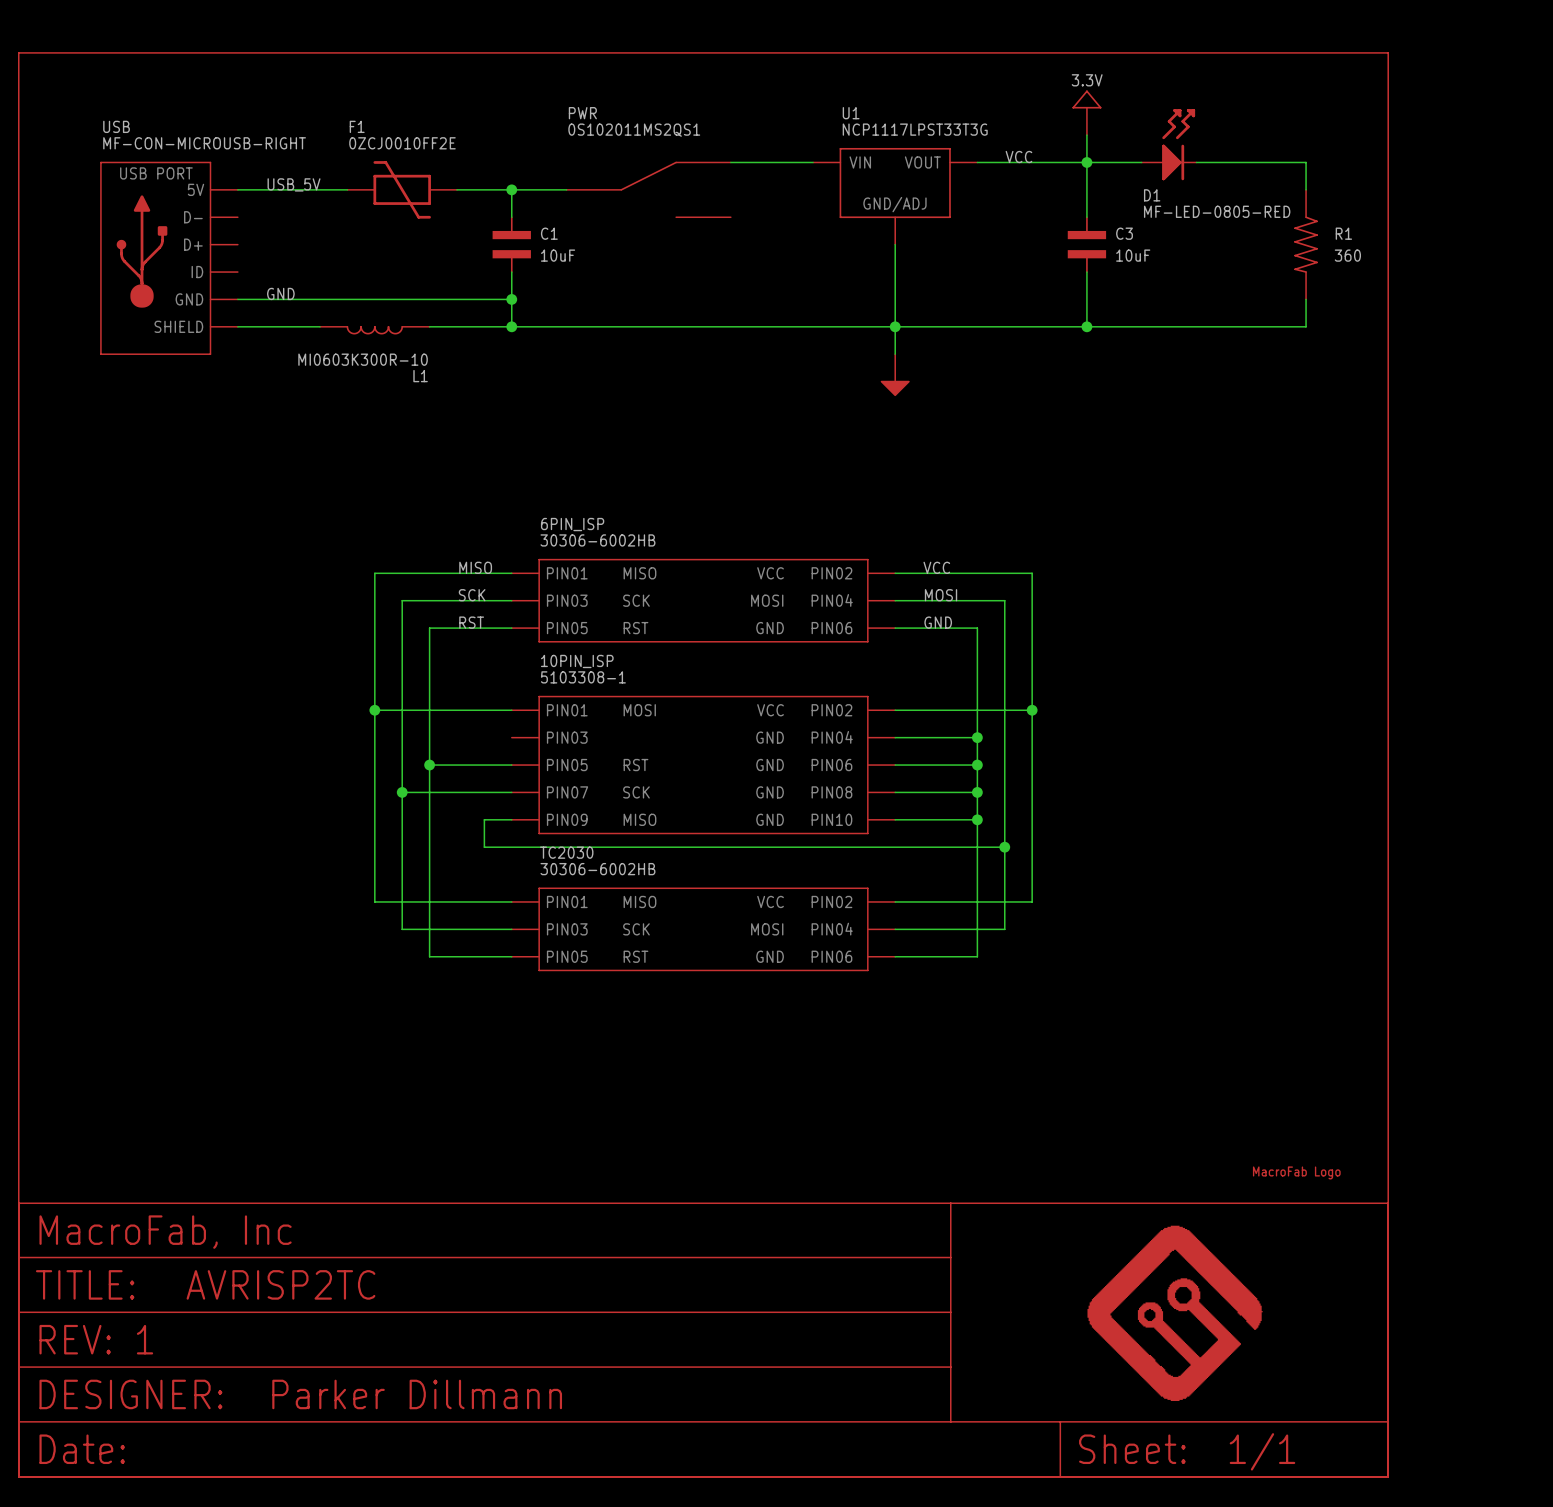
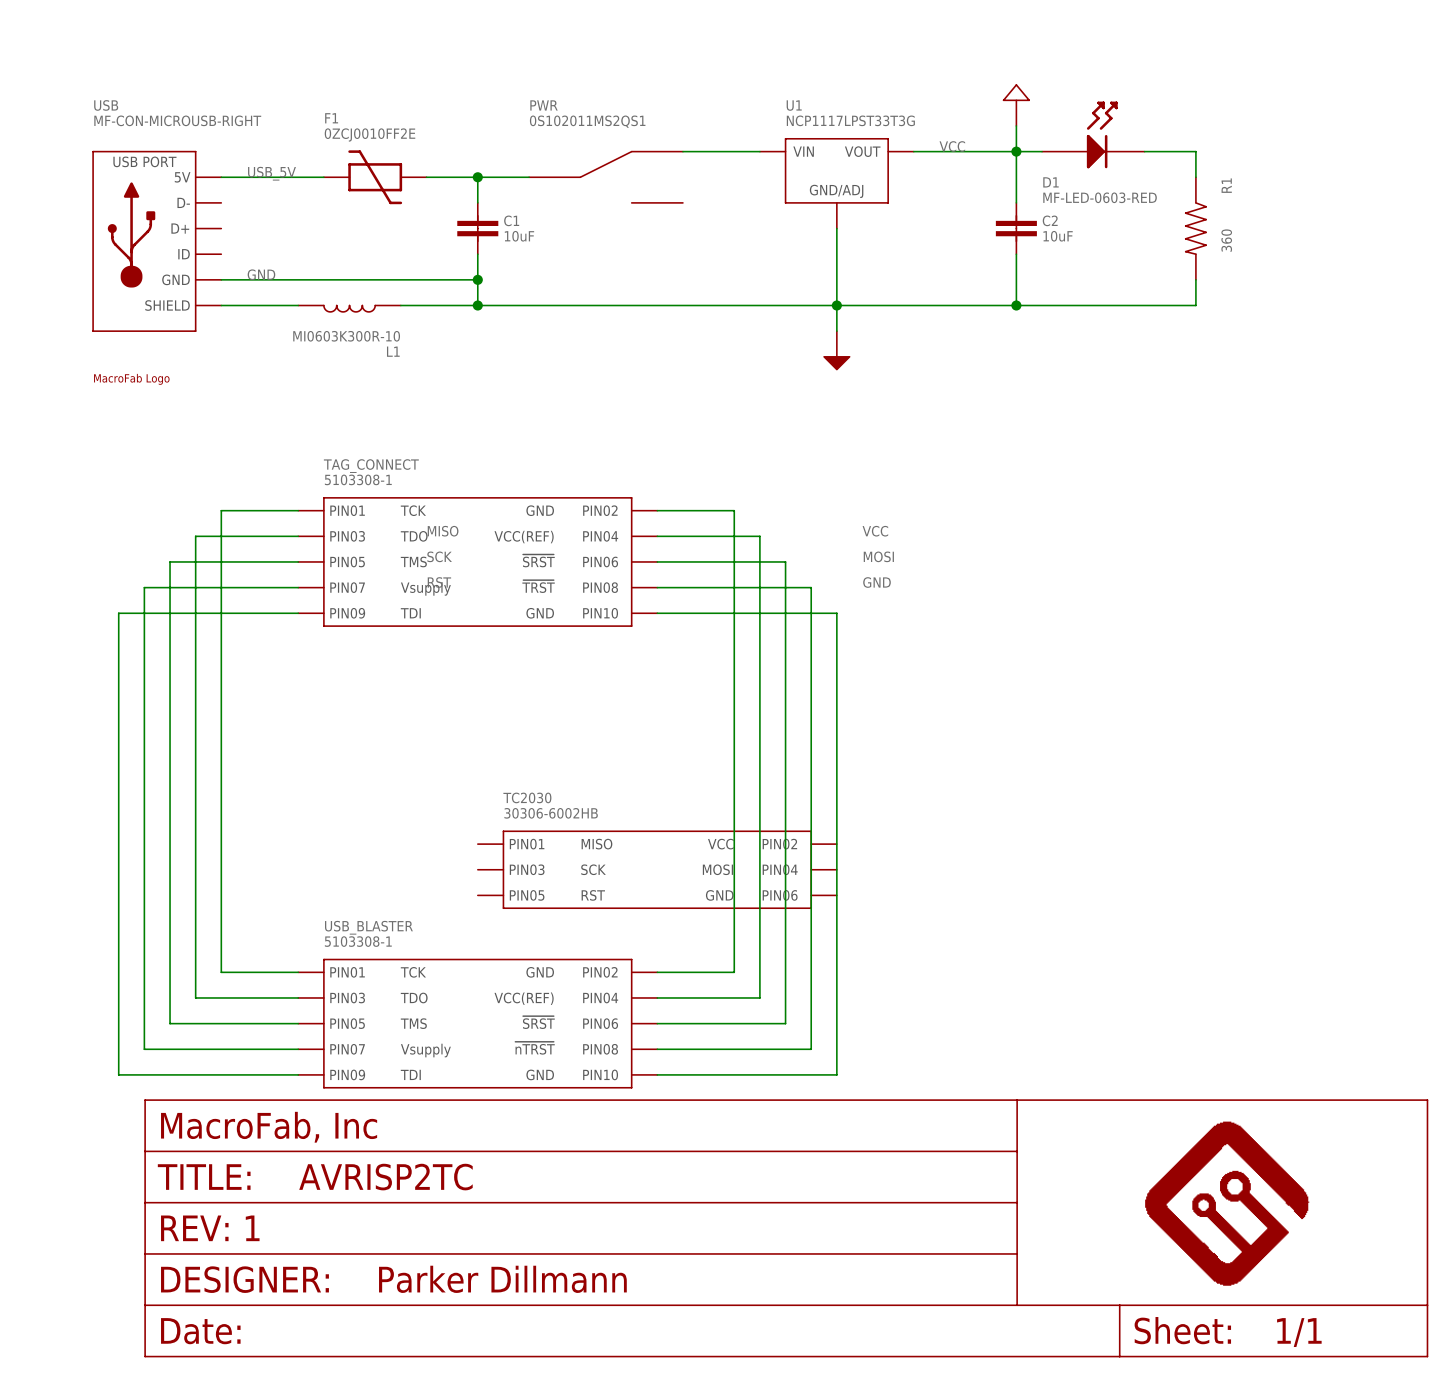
line: (18, 52) (18, 1477) (1388, 1477) (1388, 52) (18, 52) -> none
power symbol text: 3.3V (1087, 80) -> none
D1 symbol: [1141, 109, 1197, 181] -> [1042, 101, 1145, 169]
USB name position: USB (116, 126) -> USB (106, 105)
USB value position: MF-CON-MICROUSB-RIGHT (204, 143) -> MF-CON-MICROUSB-RIGHT (177, 120)
wire: (1278, 162) (1306, 162) (1306, 189) -> (1195, 151) (1195, 177)
D1 name position: D1 (1152, 195) -> D1 (1050, 182)
D1 value: MF-LED-0805-RED (1217, 211) -> MF-LED-0603-RED (1100, 197)
C1 symbol: [492, 216, 531, 273] -> [457, 202, 499, 255]
R1 name rotation: 0° (1343, 233) -> 90° counterclockwise (1226, 185)
R1 name position: R1 (1343, 233) -> R1 (1226, 185)
C3: 10uF (1086, 244) -> none
C2: none -> 10uF (1016, 228)
R1 position: (1306, 244) -> (1195, 228)
R1 value rotation: 0° (1347, 255) -> 90° counterclockwise (1226, 240)
wire: (1306, 299) (1306, 326) (1278, 326) -> (1195, 279) (1195, 305)
part: none -> (131, 379)
wire: none -> (298, 510) (221, 510) (221, 972) (298, 972)
wire: none -> (657, 510) (734, 510) (734, 972) (657, 972)
wire: none -> (298, 536) (195, 536) (195, 997) (298, 997)
wire: (511, 573) (374, 573) (374, 901) (511, 901) -> none
wire: none -> (657, 536) (759, 536) (759, 997) (657, 997)
wire: (895, 573) (1032, 573) (1032, 901) (895, 901) -> none
wire: none -> (298, 561) (170, 561) (170, 1023) (298, 1023)
wire: (511, 600) (402, 600) (402, 929) (511, 929) -> none
TAG_CONNECT: none -> 5103308-1 (477, 561)
wire: none -> (657, 561) (785, 561) (785, 1023) (657, 1023)
6PIN_ISP: 30306-6002HB (703, 600) -> none
wire: (895, 600) (1004, 600) (1004, 929) (895, 929) -> none
wire: none -> (298, 587) (144, 587) (144, 1049) (298, 1049)
wire: (511, 628) (429, 628) (429, 956) (511, 956) -> none
wire: none -> (657, 587) (811, 587) (811, 1049) (657, 1049)
wire: (895, 628) (977, 628) (977, 956) (895, 956) -> none
wire: none -> (298, 613) (118, 613) (118, 1074) (298, 1074)
wire: none -> (657, 613) (836, 613) (836, 1074) (657, 1074)
wire: (374, 710) (511, 710) -> none
junction: (374, 710) -> none
wire: (895, 710) (1032, 710) -> none
junction: (1032, 710) -> none
wire: (895, 737) (977, 737) -> none
junction: (977, 737) -> none
wire: (429, 765) (511, 765) -> none
junction: (429, 765) -> none
10PIN_ISP: 5103308-1 (703, 765) -> none
wire: (895, 765) (977, 765) -> none
junction: (977, 765) -> none
wire: (402, 792) (511, 792) -> none
junction: (402, 792) -> none
wire: (895, 792) (977, 792) -> none
junction: (977, 792) -> none
wire: (511, 819) (484, 819) (484, 847) (1004, 847) -> none
wire: (895, 819) (977, 819) -> none
junction: (977, 819) -> none
junction: (1004, 847) -> none
USB_BLASTER: none -> 5103308-1 (477, 1023)
part: (1296, 1172) -> none
part: none -> (786, 1228)
part: (703, 1340) -> none

